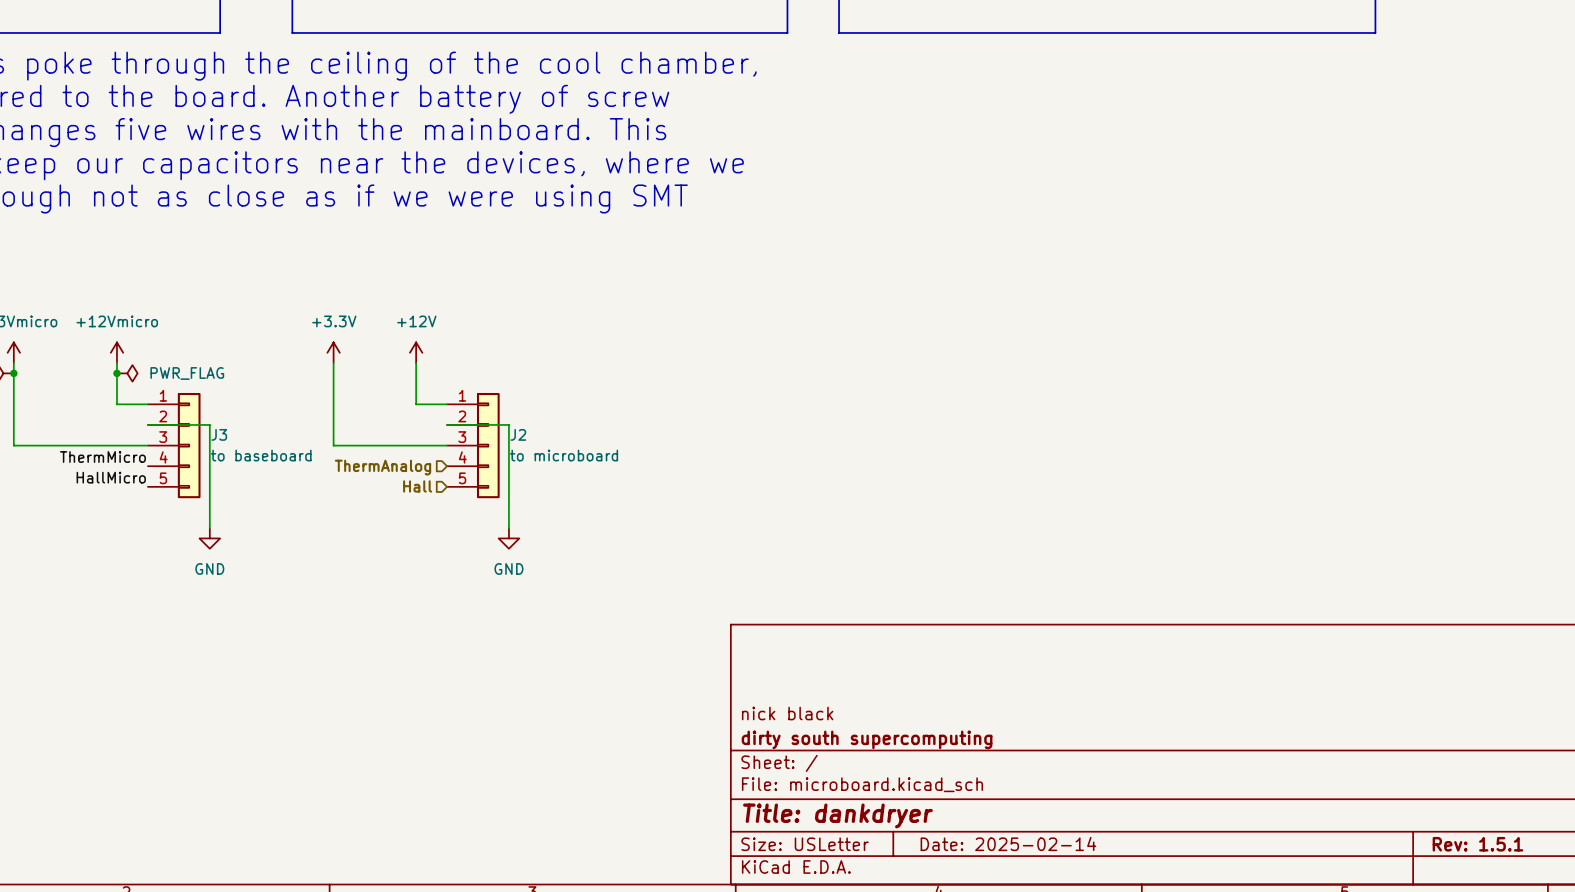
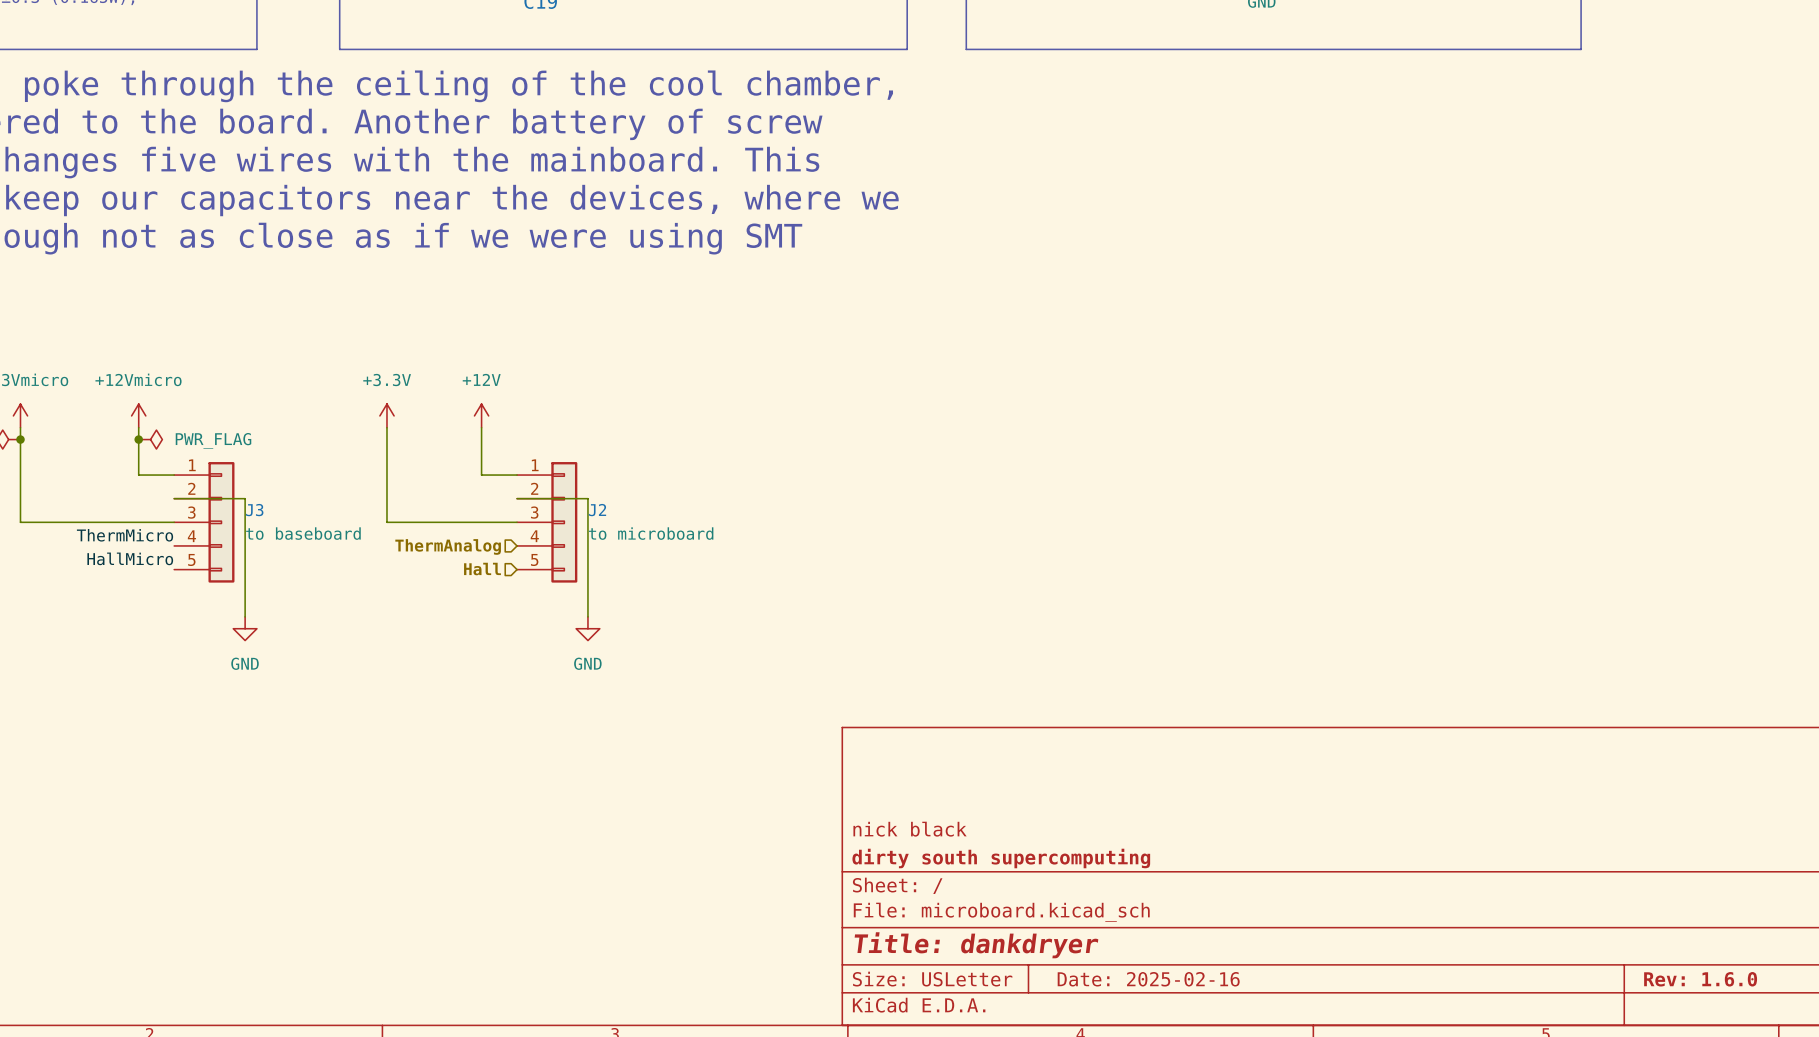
title block: Date: 2025-02-14 (1008, 843) -> Date: 2025-02-16 (1148, 979)
title block: Rev: 1.5.1 (1477, 844) -> Rev: 1.6.0 (1700, 979)

